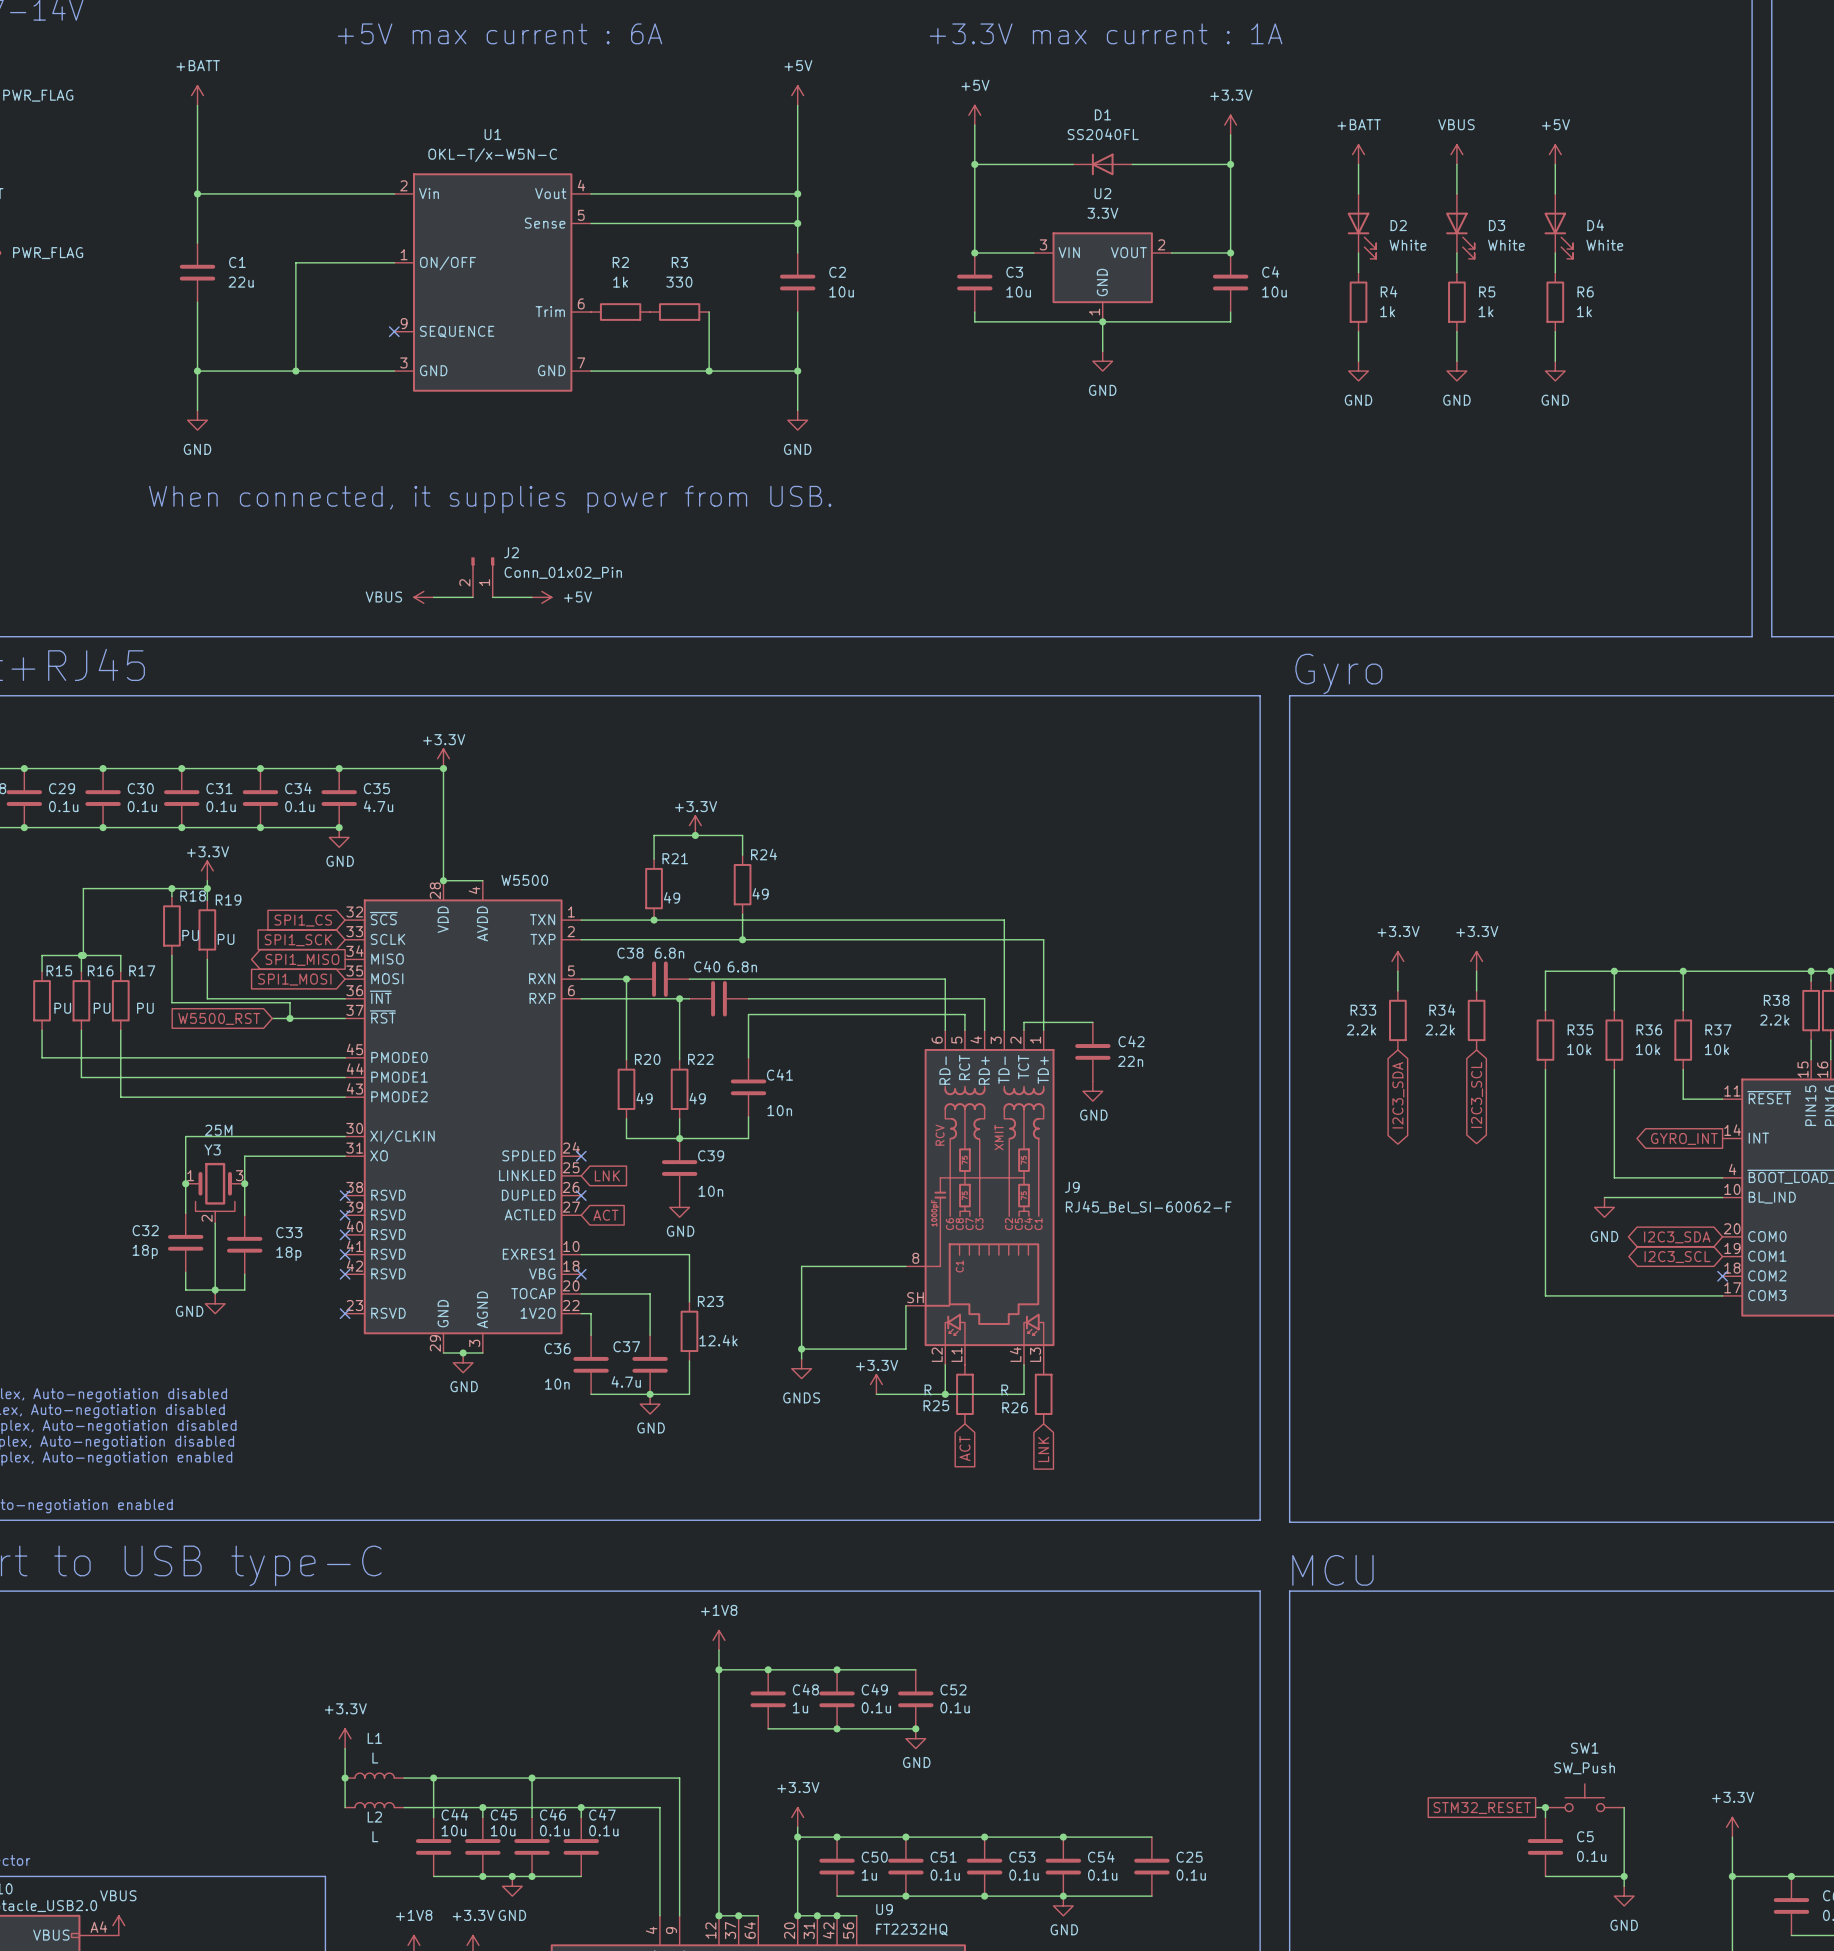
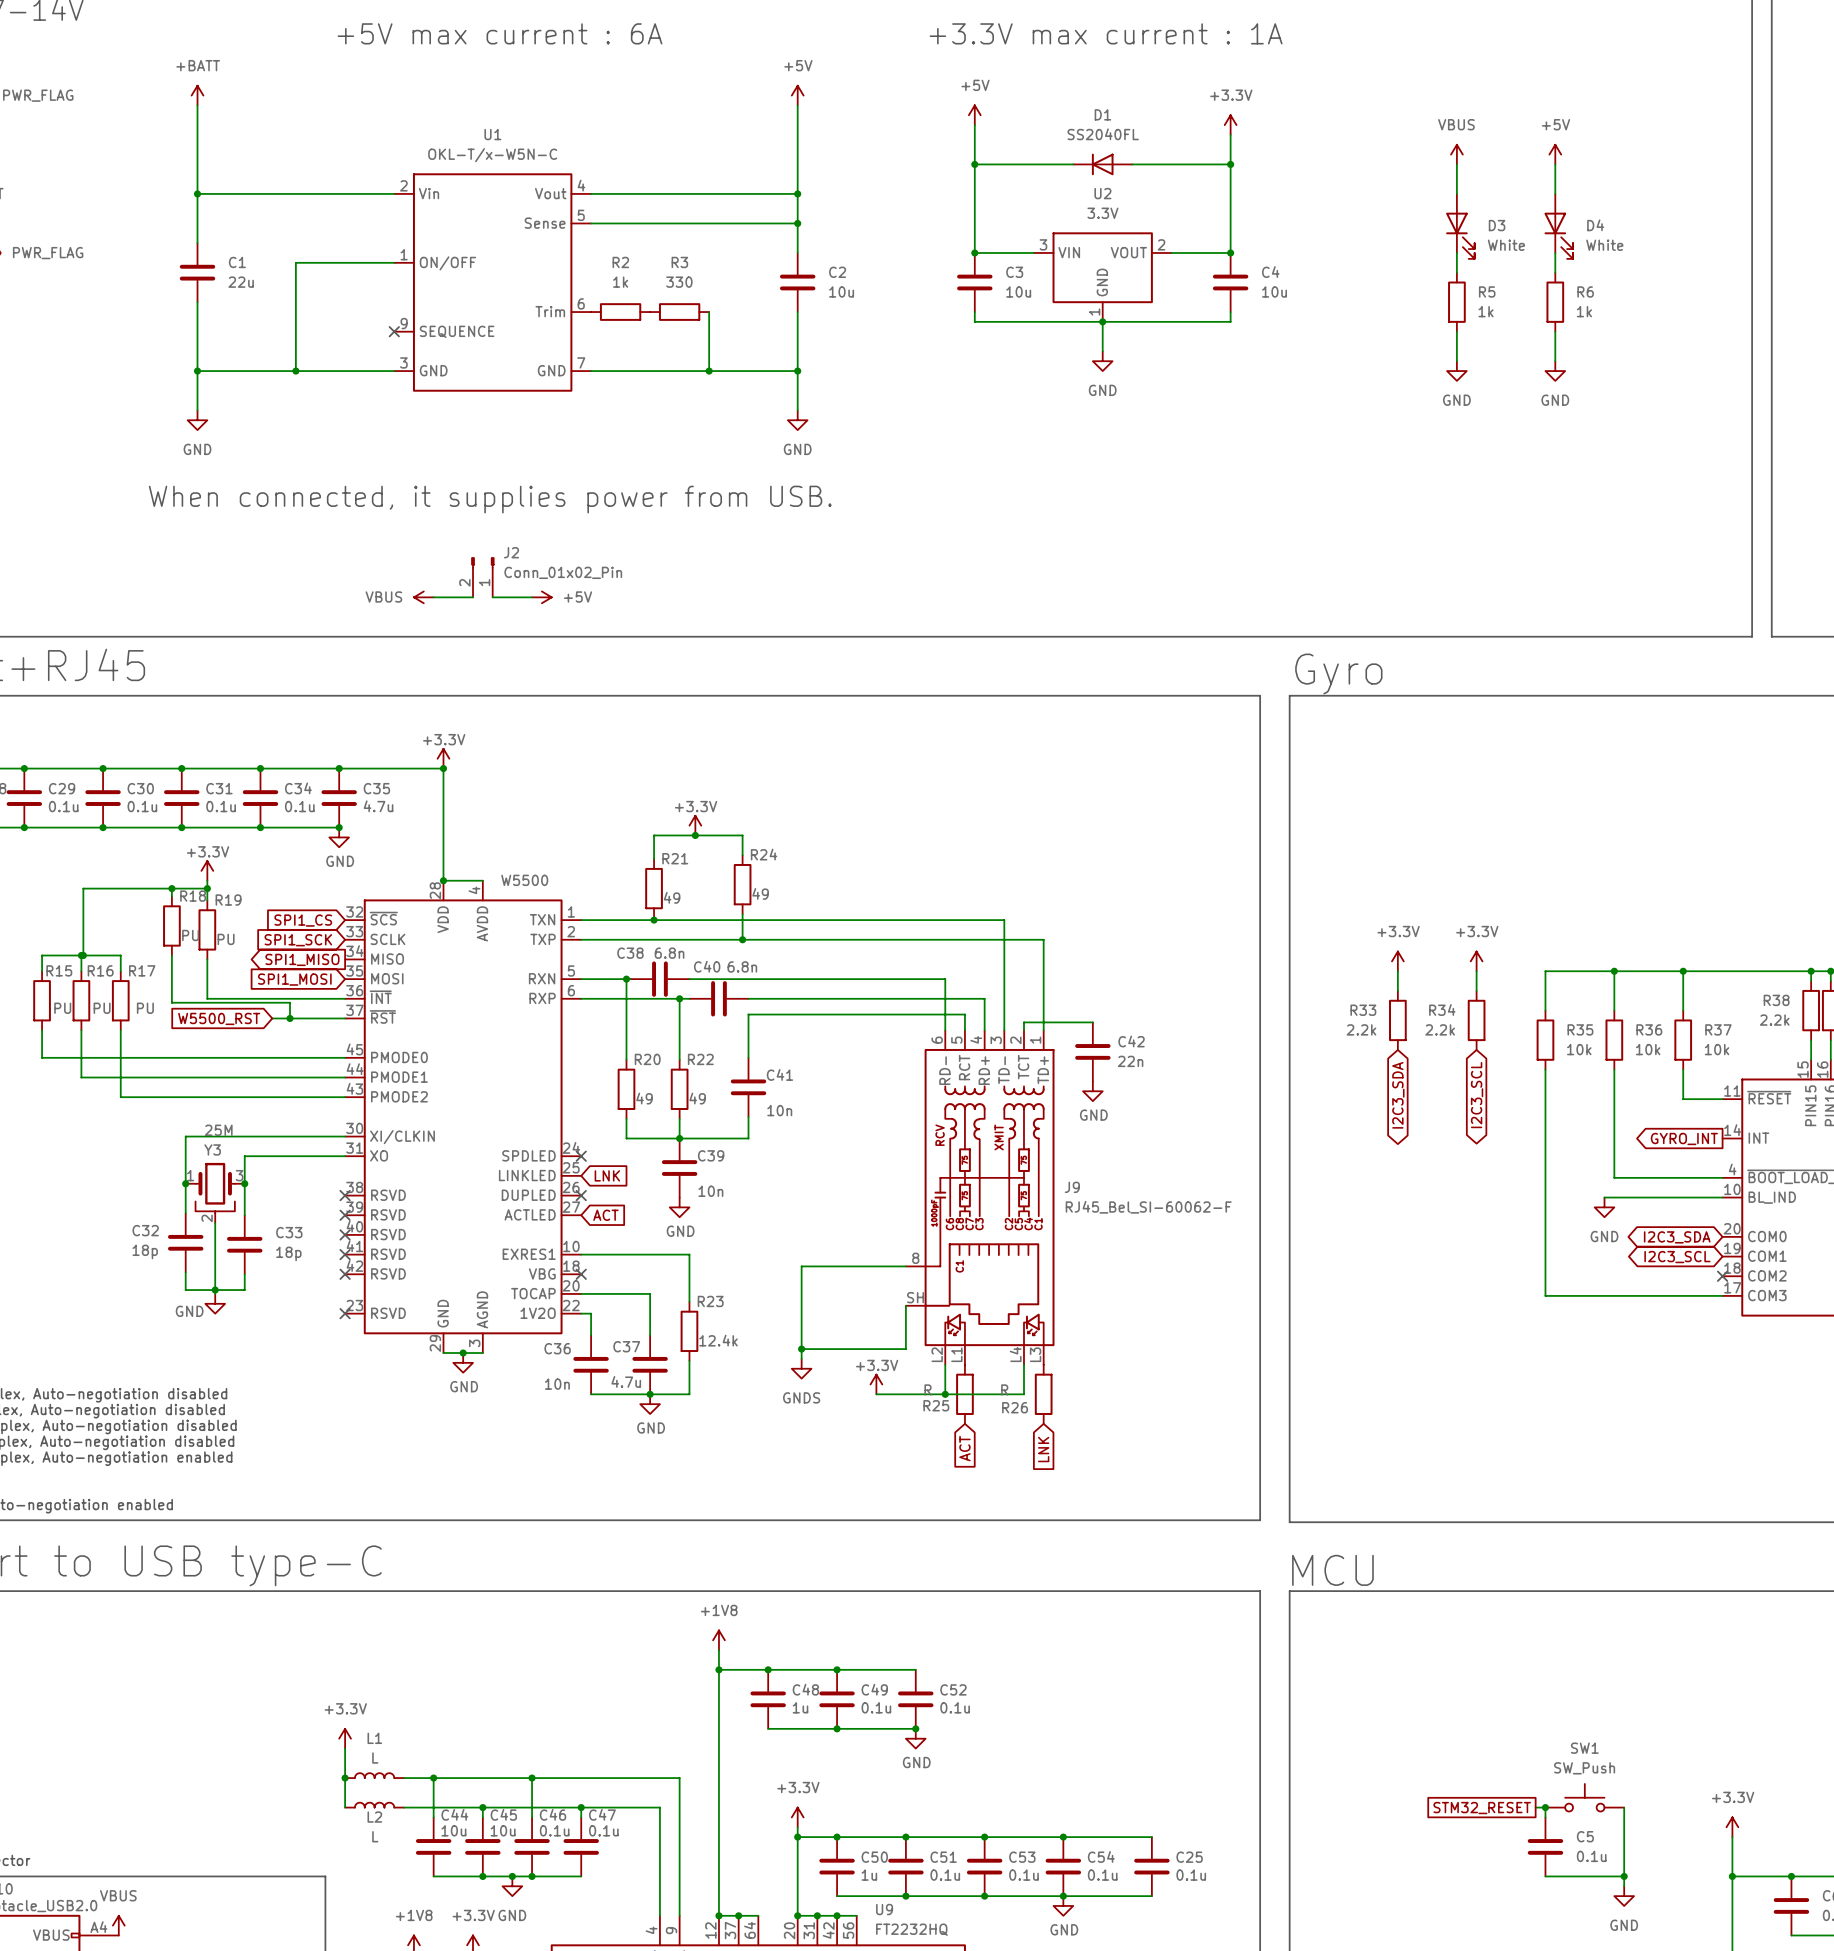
power symbol: +BATT (1358, 154) -> none
wire: (1358, 164) (1358, 193) -> none
D2: White (1361, 226) -> none
wire: (1358, 252) (1358, 272) -> none
R4: 1k (1358, 302) -> none
wire: (1358, 331) (1358, 361) -> none
power symbol: GND (1358, 371) -> none

